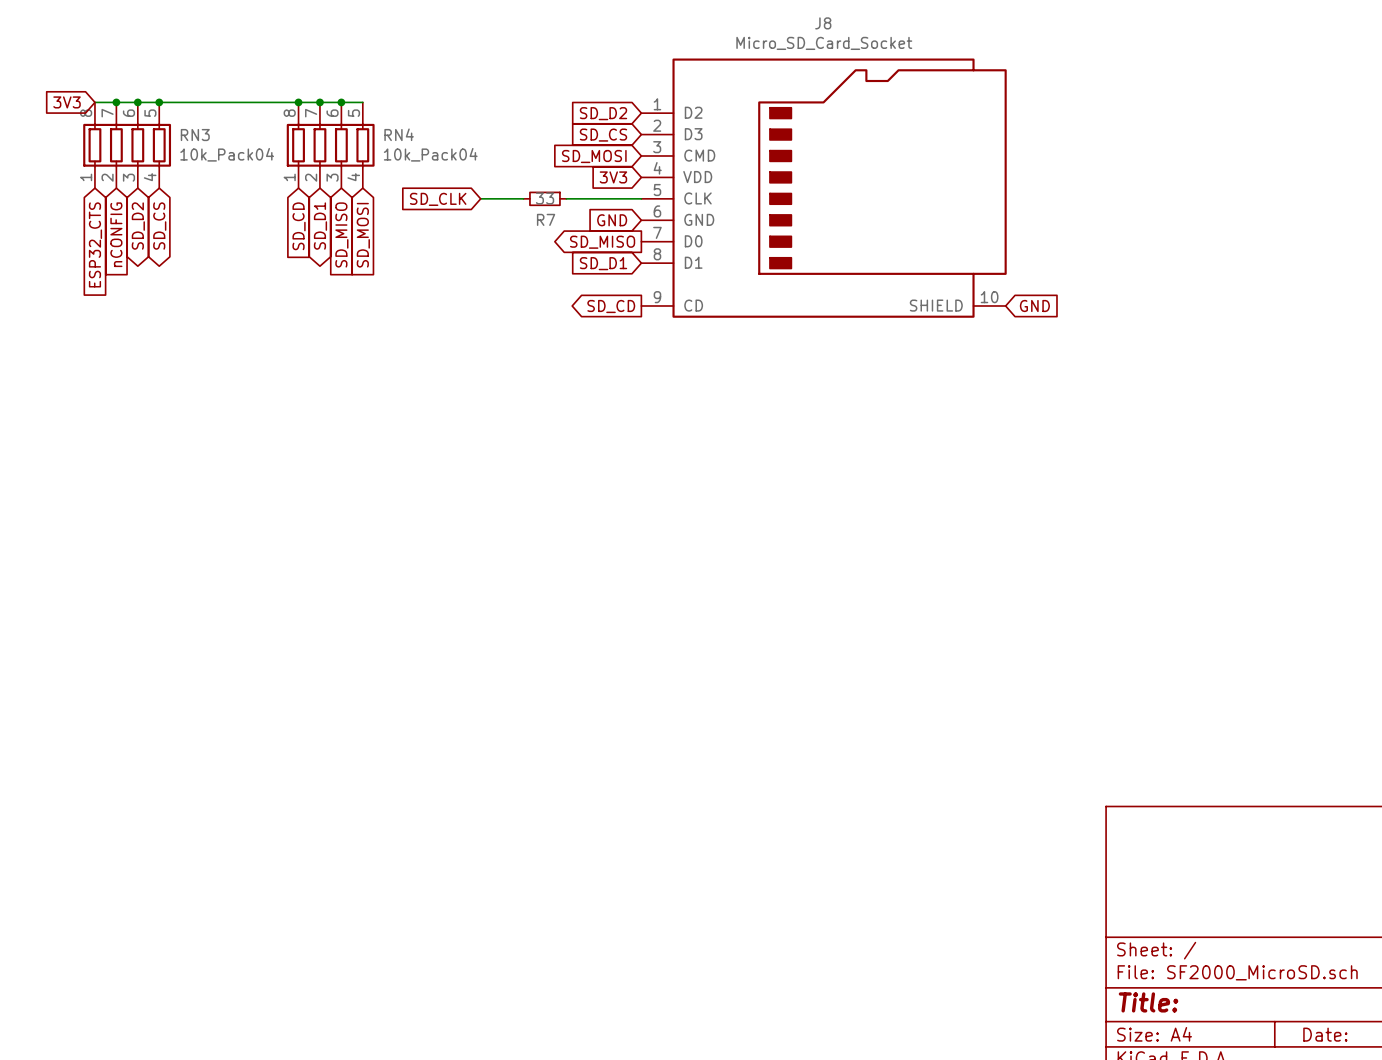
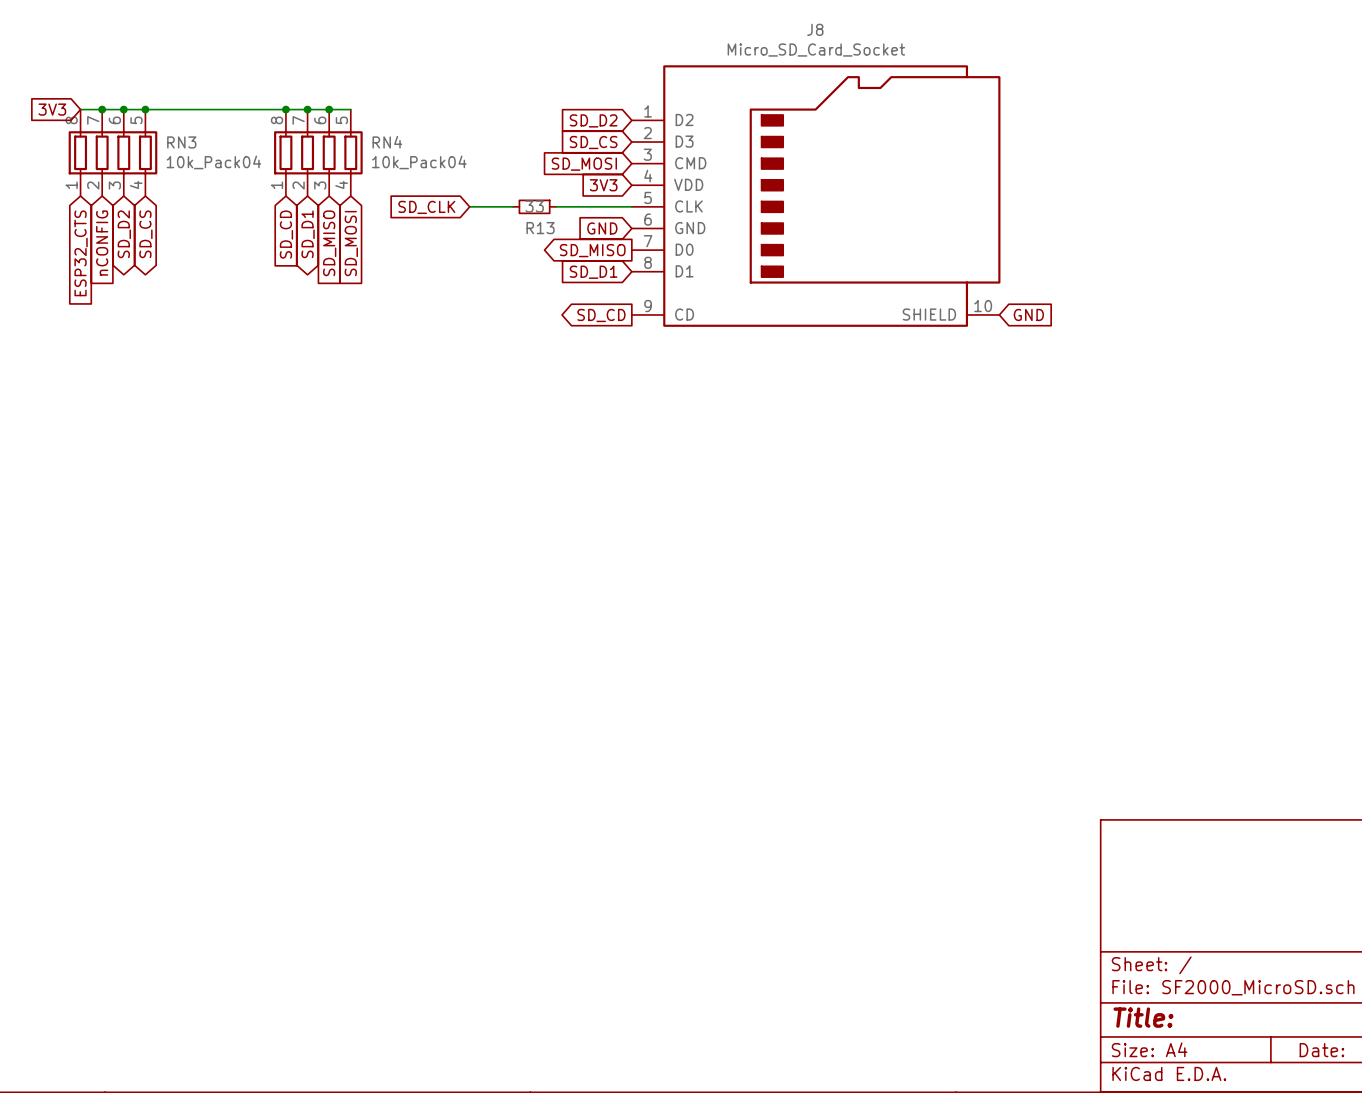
R7 name: R7 (546, 219) -> R13 (540, 228)

